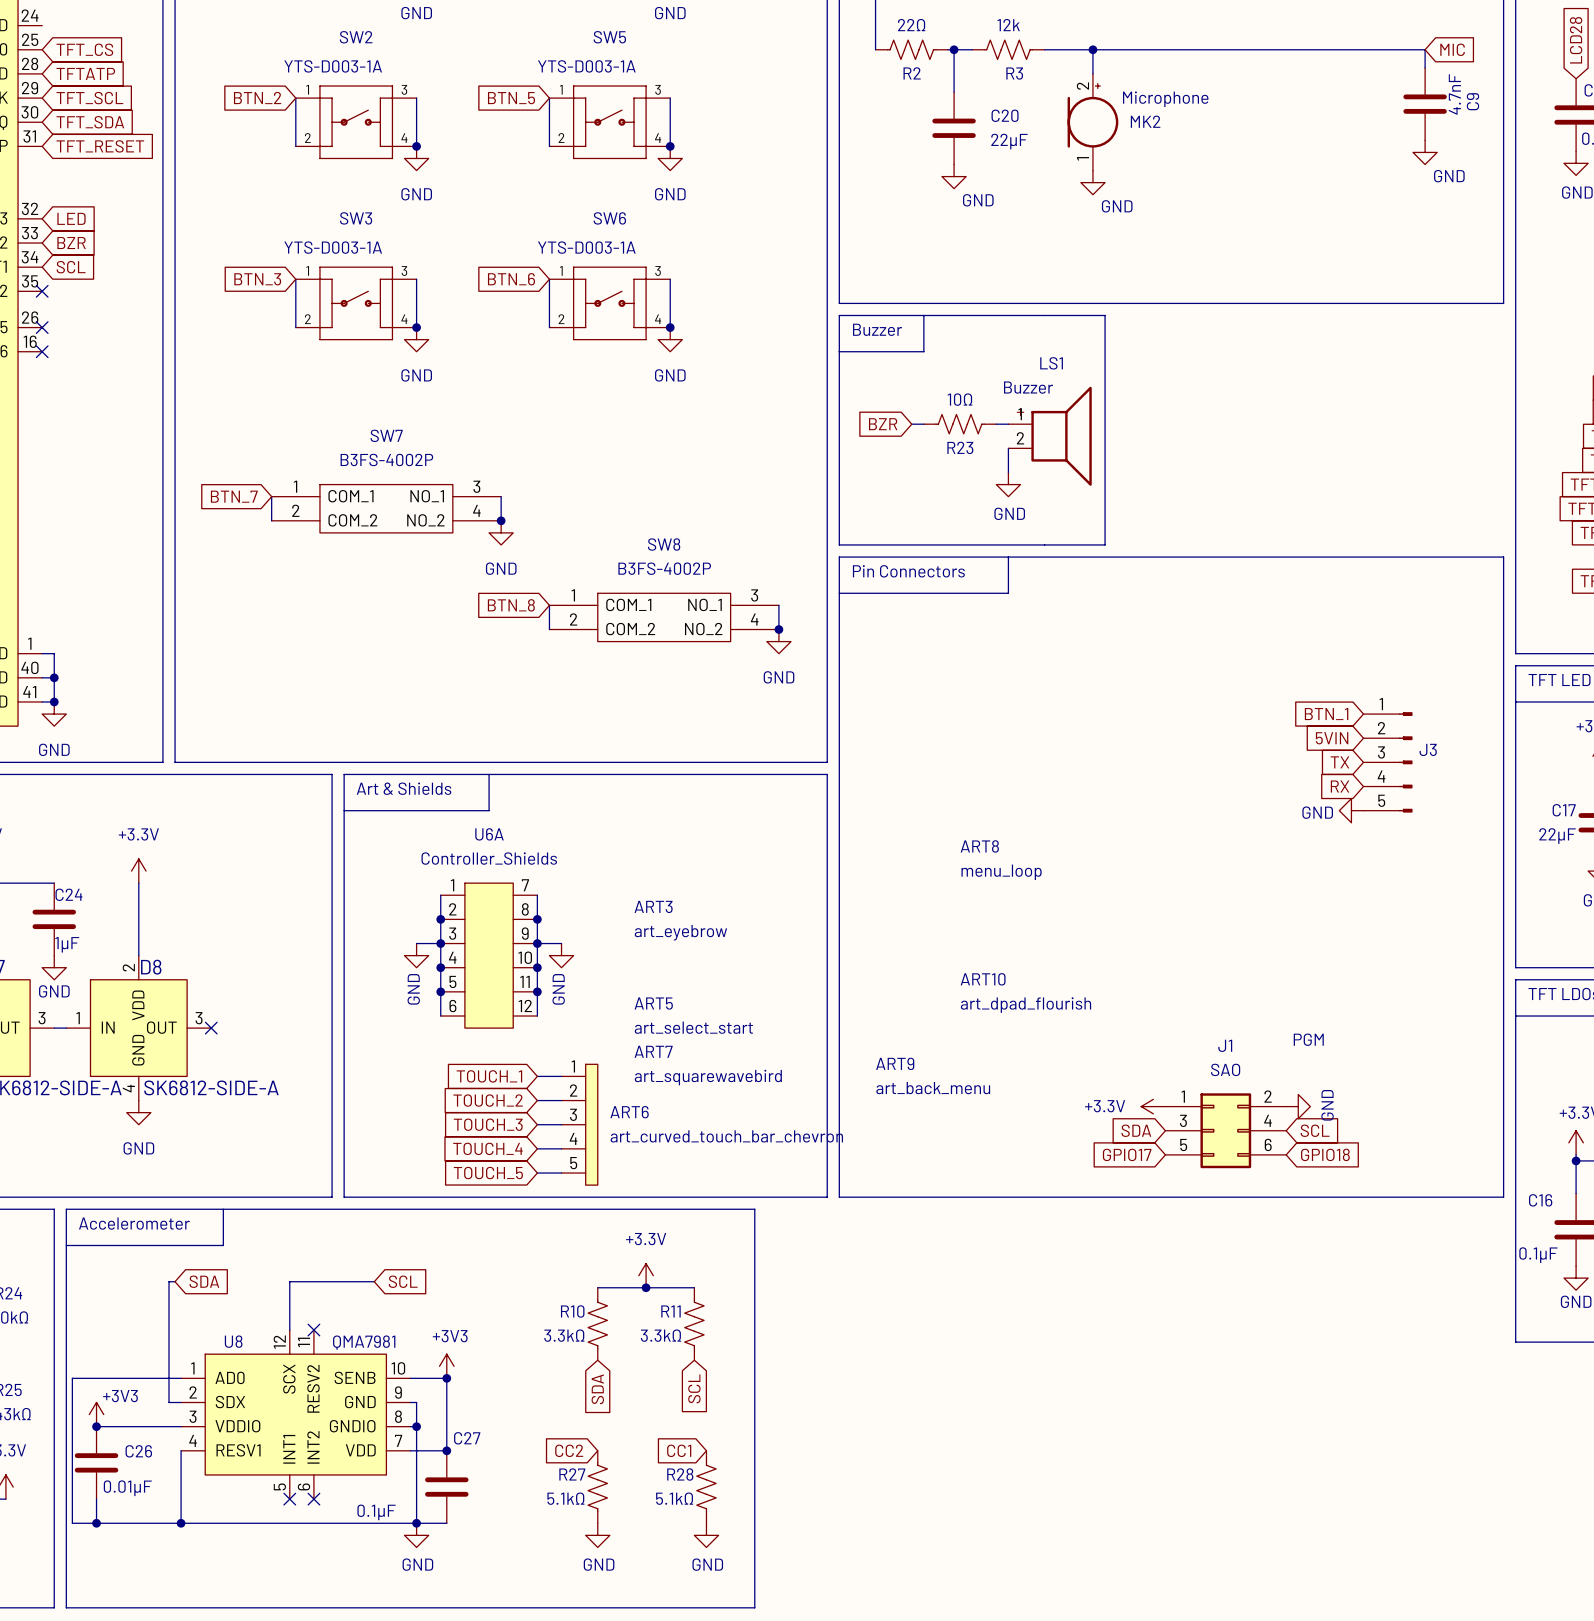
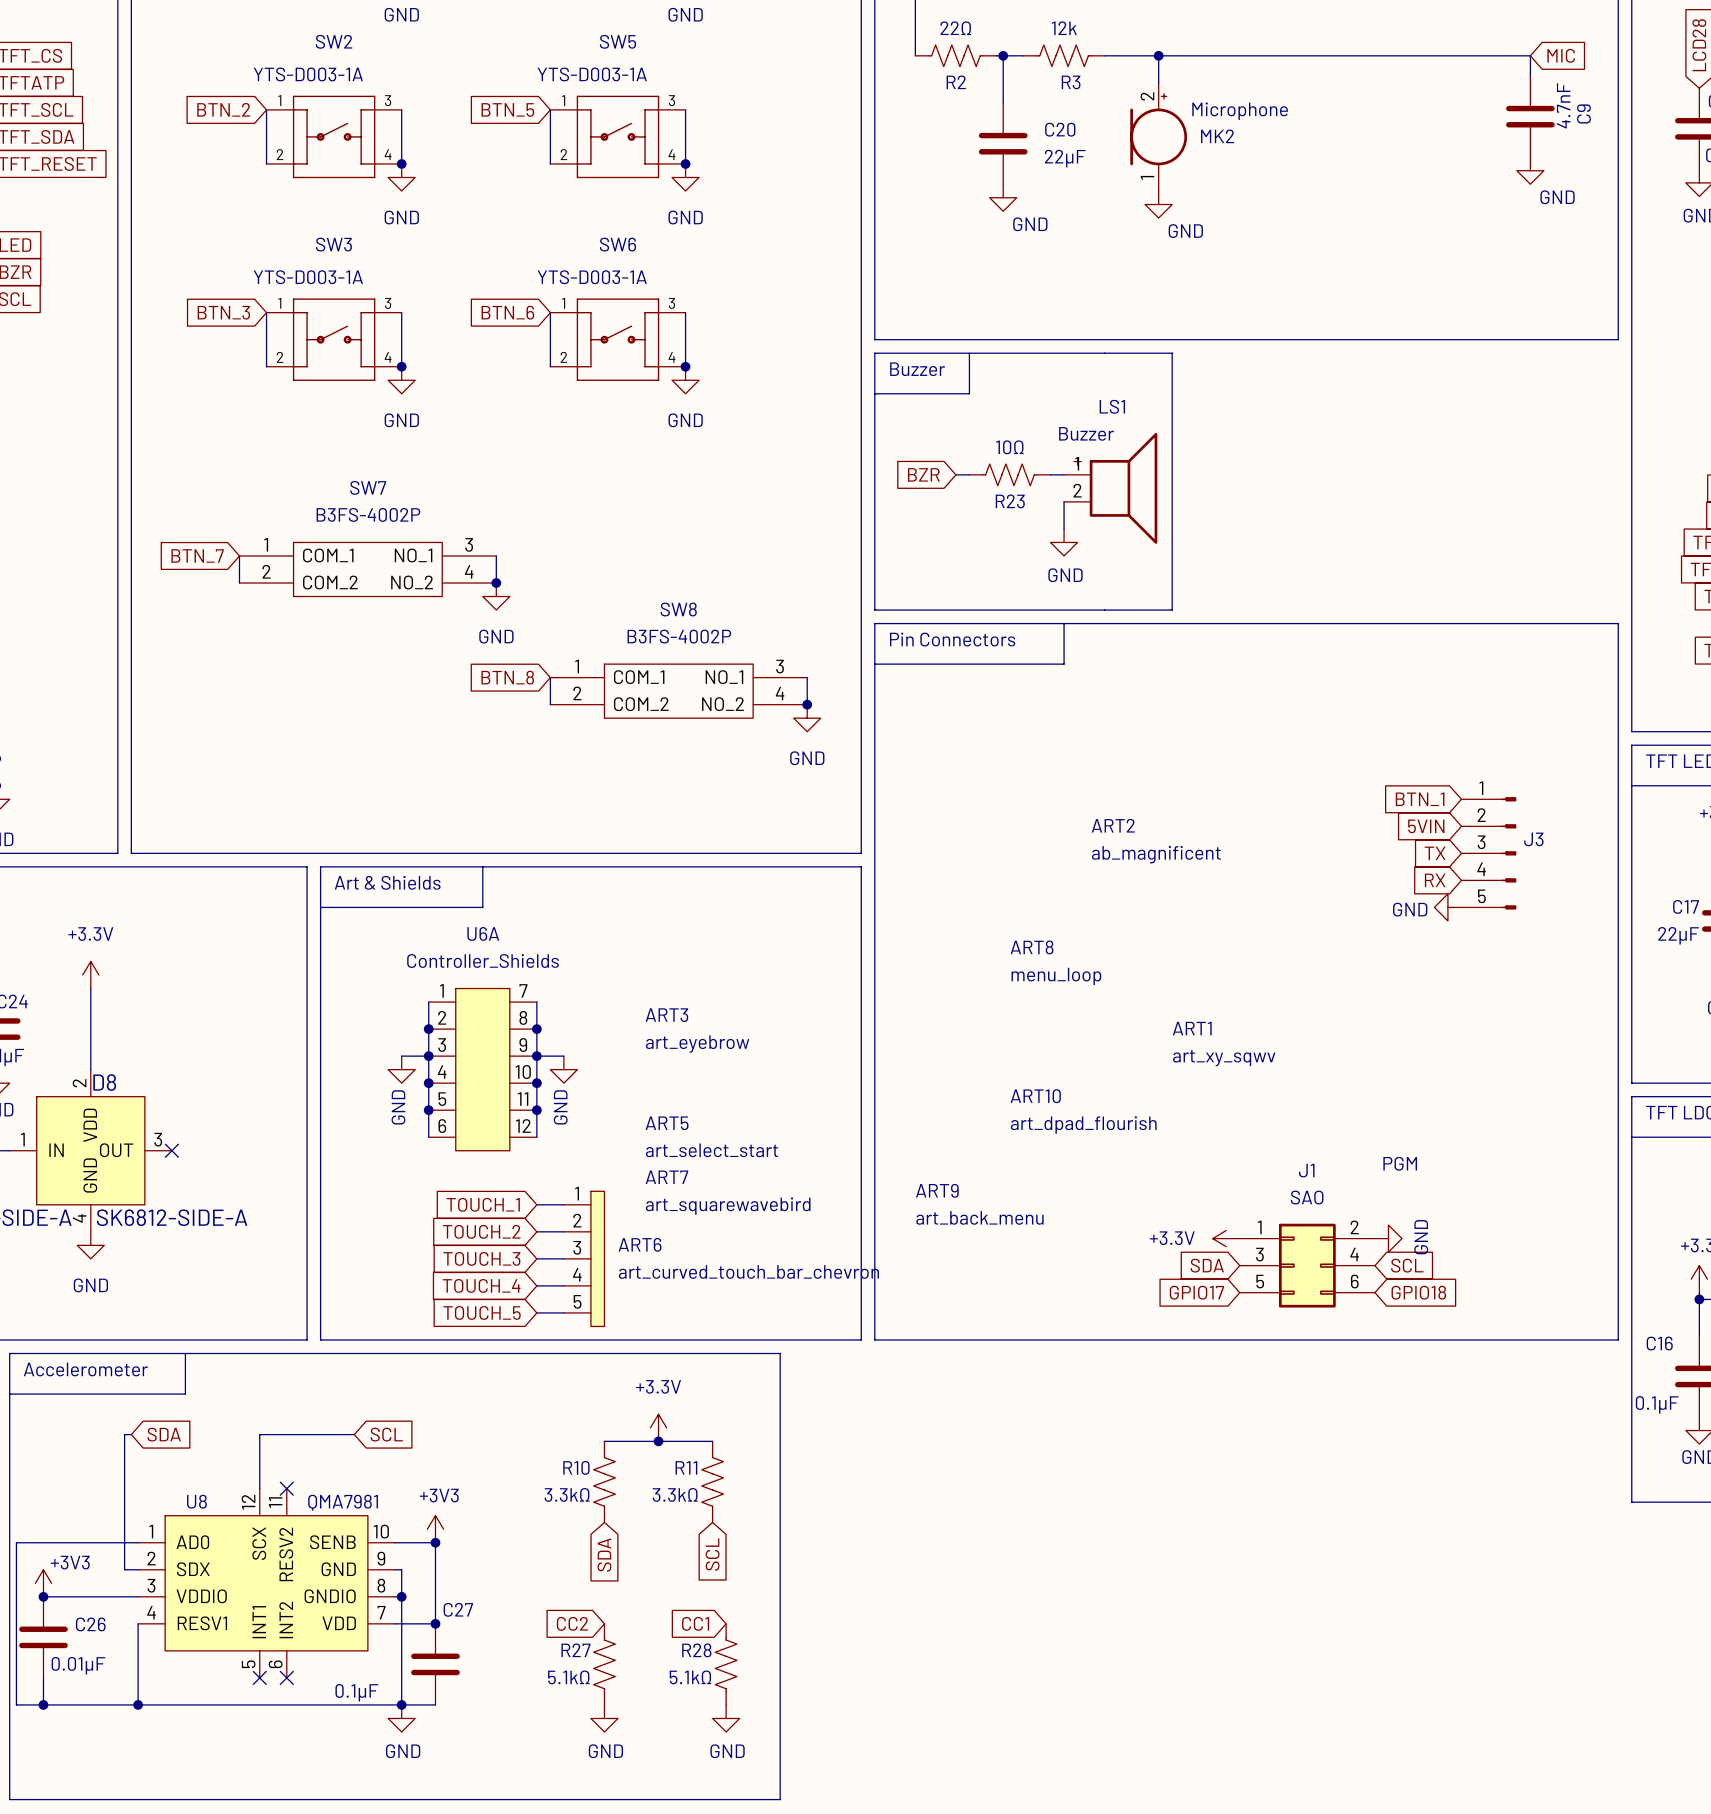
ART2: none -> ab_magnificent (1156, 841)
ART1: none -> art_xy_sqwv (1224, 1044)

